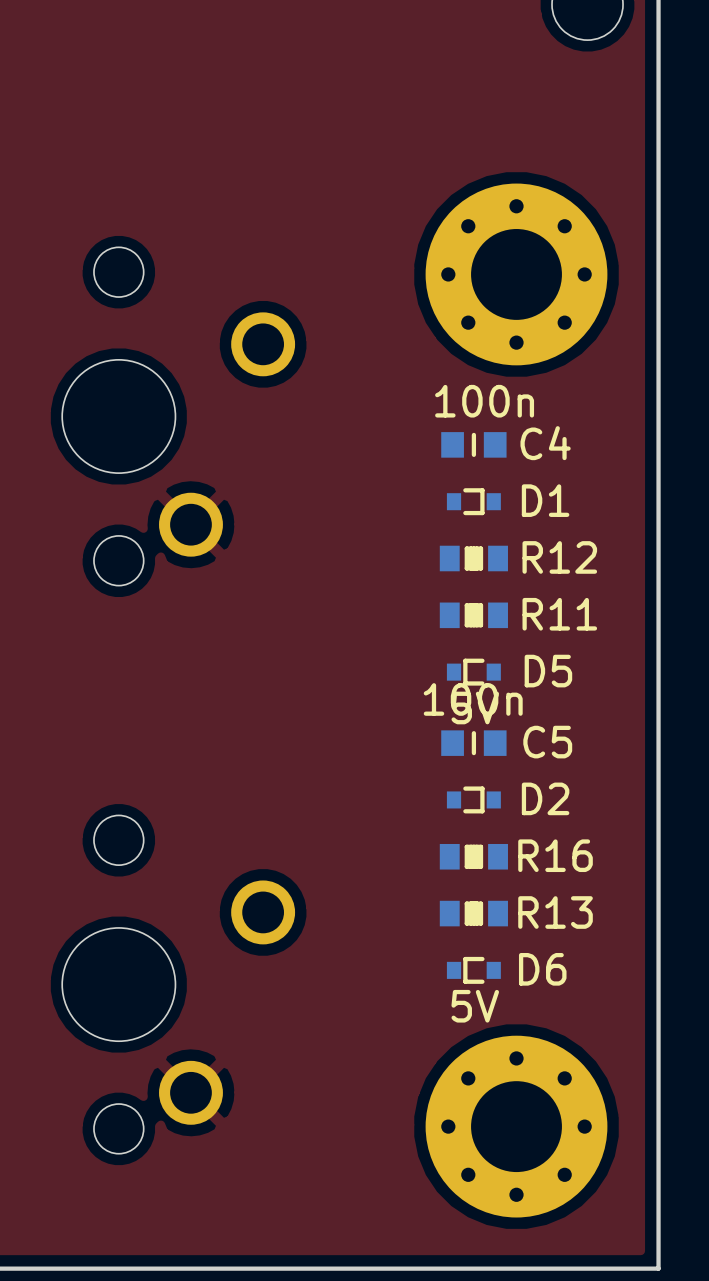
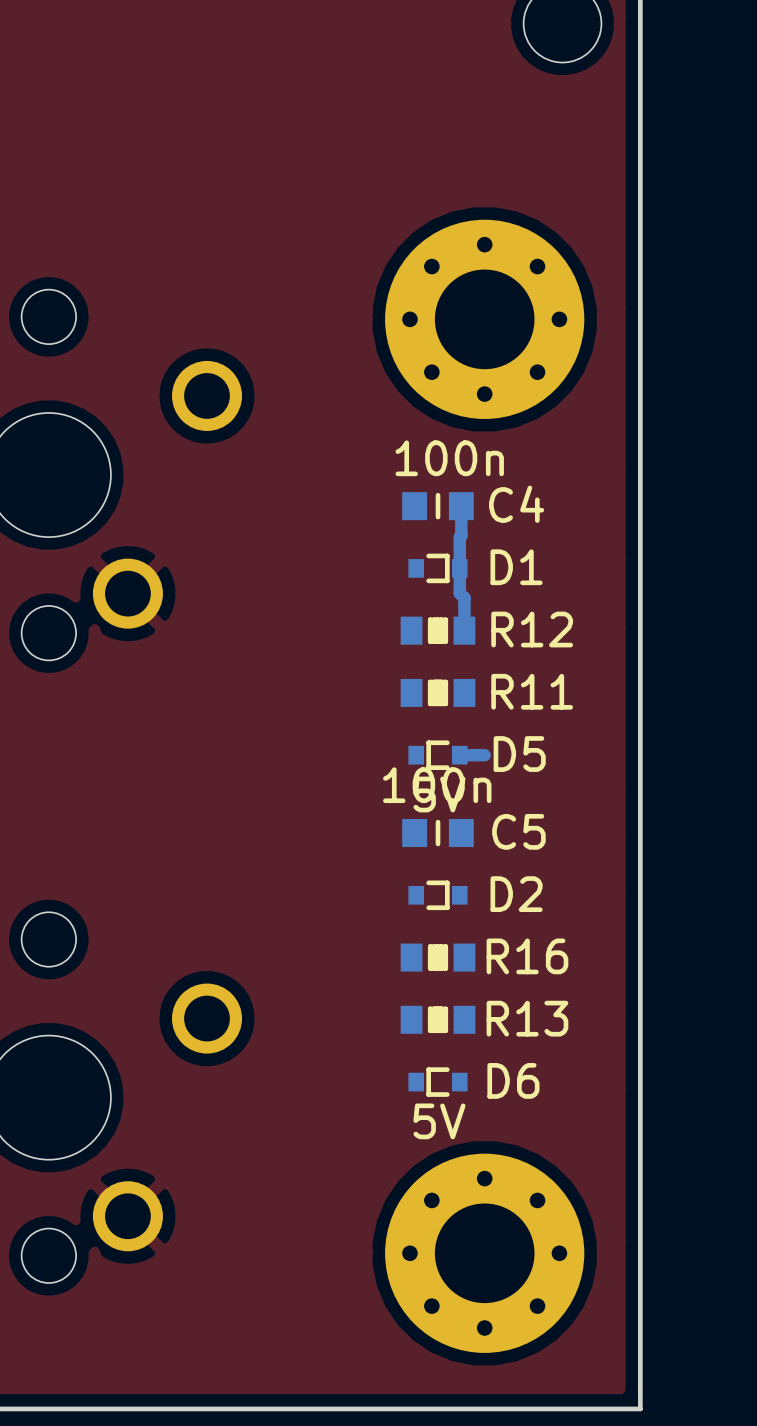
bottom track: none -> (461, 506) (459, 593) (464, 597) (464, 630)
bottom track: none -> (484, 755) (459, 755)

